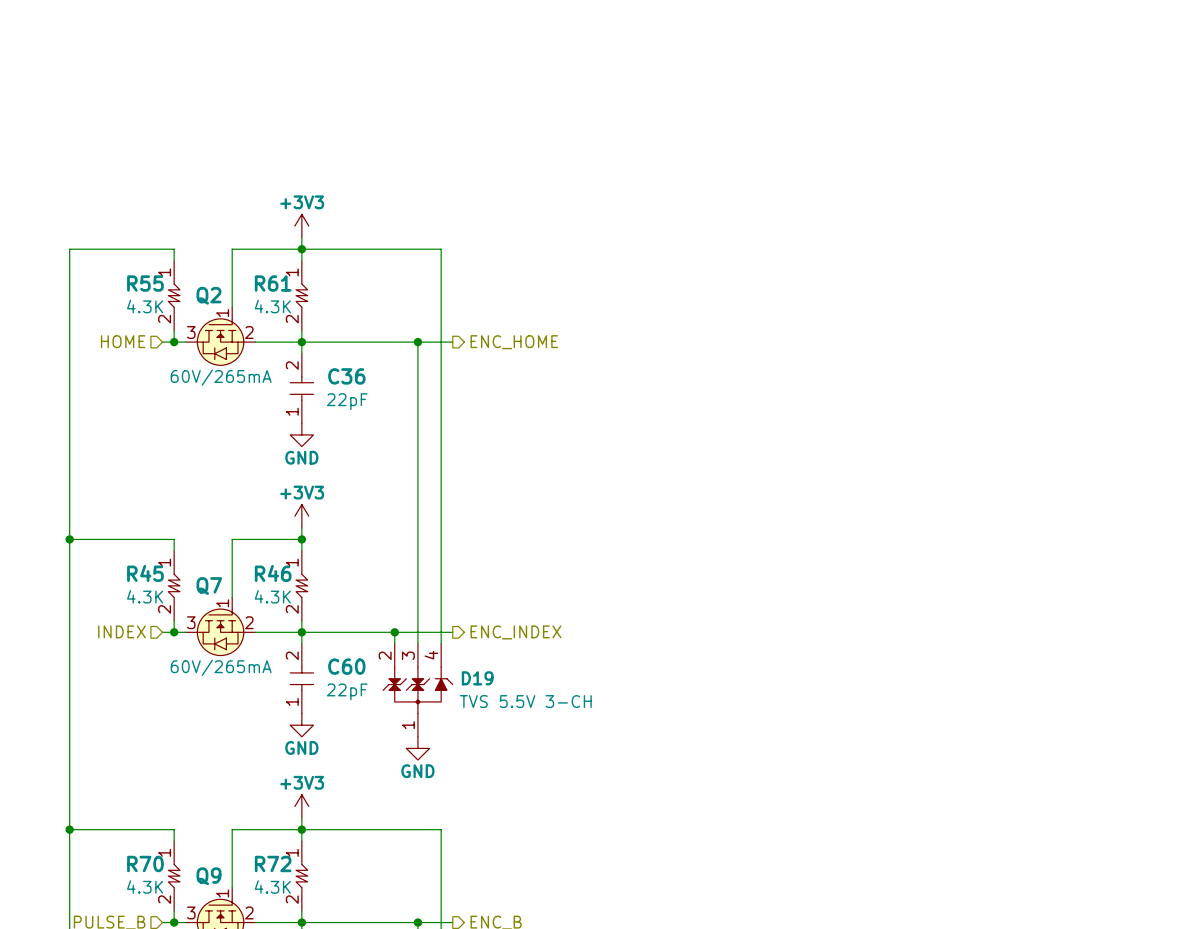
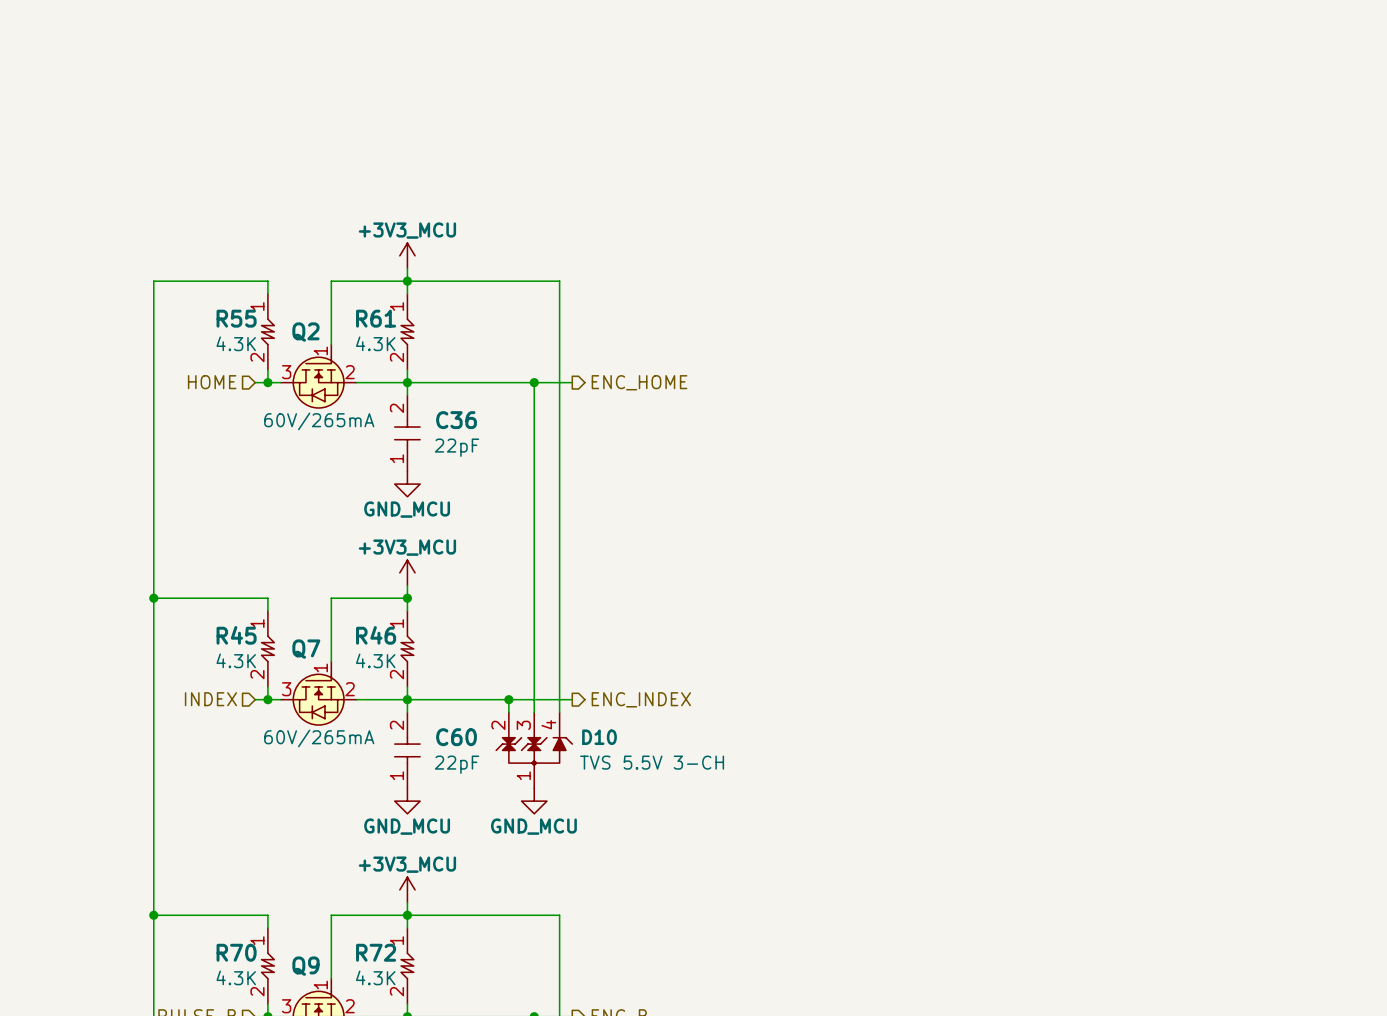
power symbol: +3V3 (301, 225) -> +3V3_MCU (407, 255)
power symbol: GND (301, 434) -> GND_MCU (407, 484)
power symbol: +3V3 (301, 516) -> +3V3_MCU (407, 572)
D10: none -> TVS 5.5V 3-CH (534, 750)
D19: TVS 5.5V 3-CH (417, 690) -> none
power symbol: GND (301, 725) -> GND_MCU (407, 801)
power symbol: none -> GND_MCU (534, 801)
power symbol: GND (417, 748) -> none
power symbol: +3V3 (301, 806) -> +3V3_MCU (407, 889)

